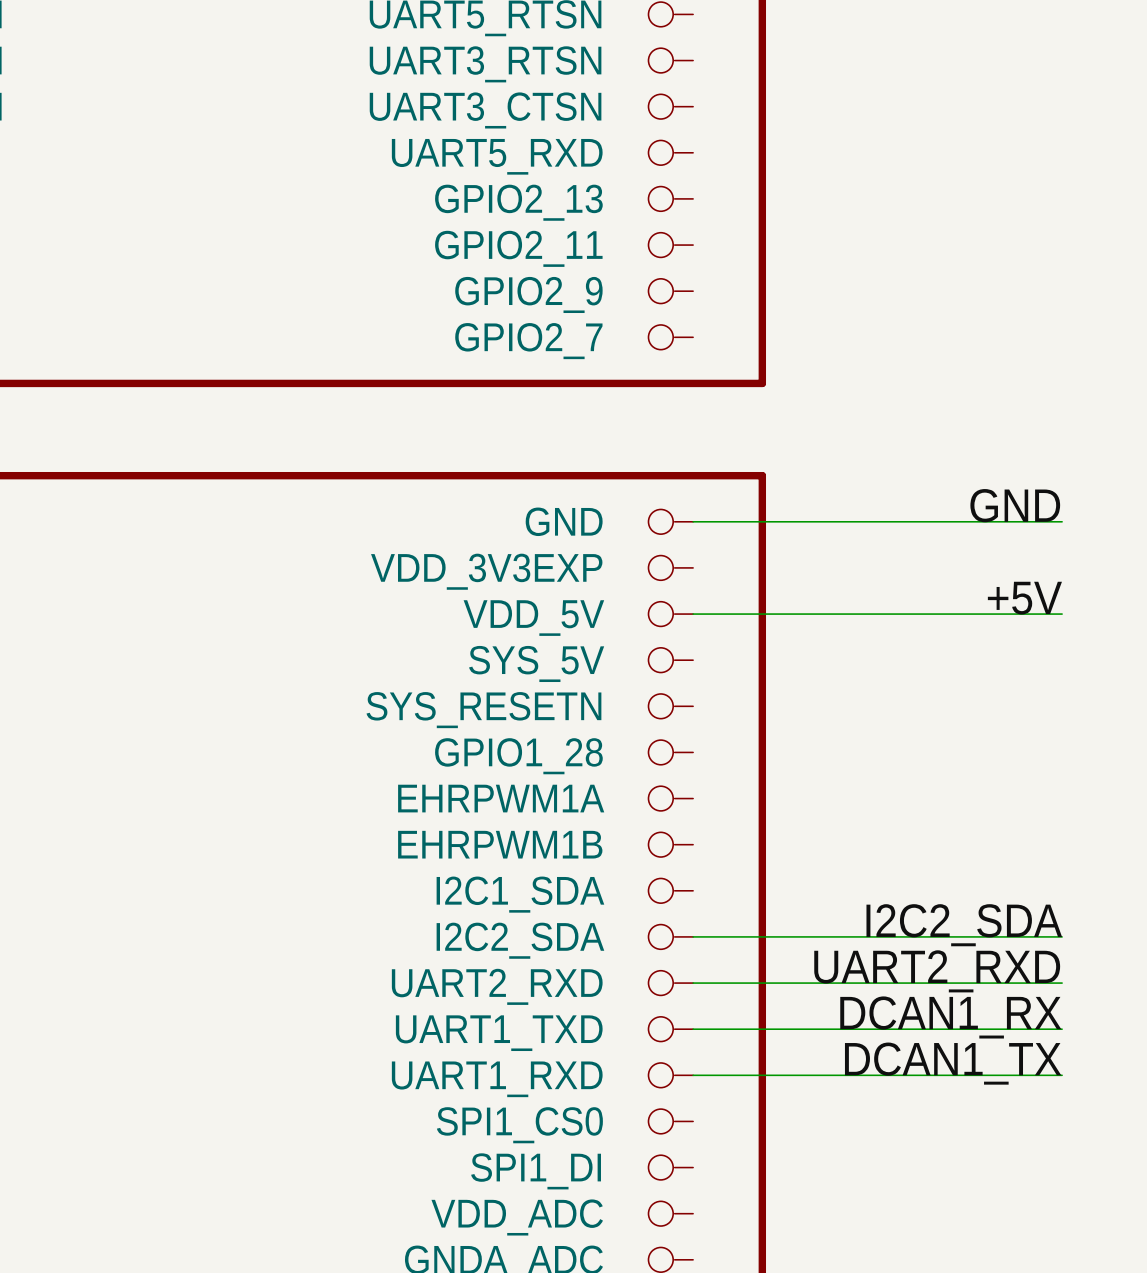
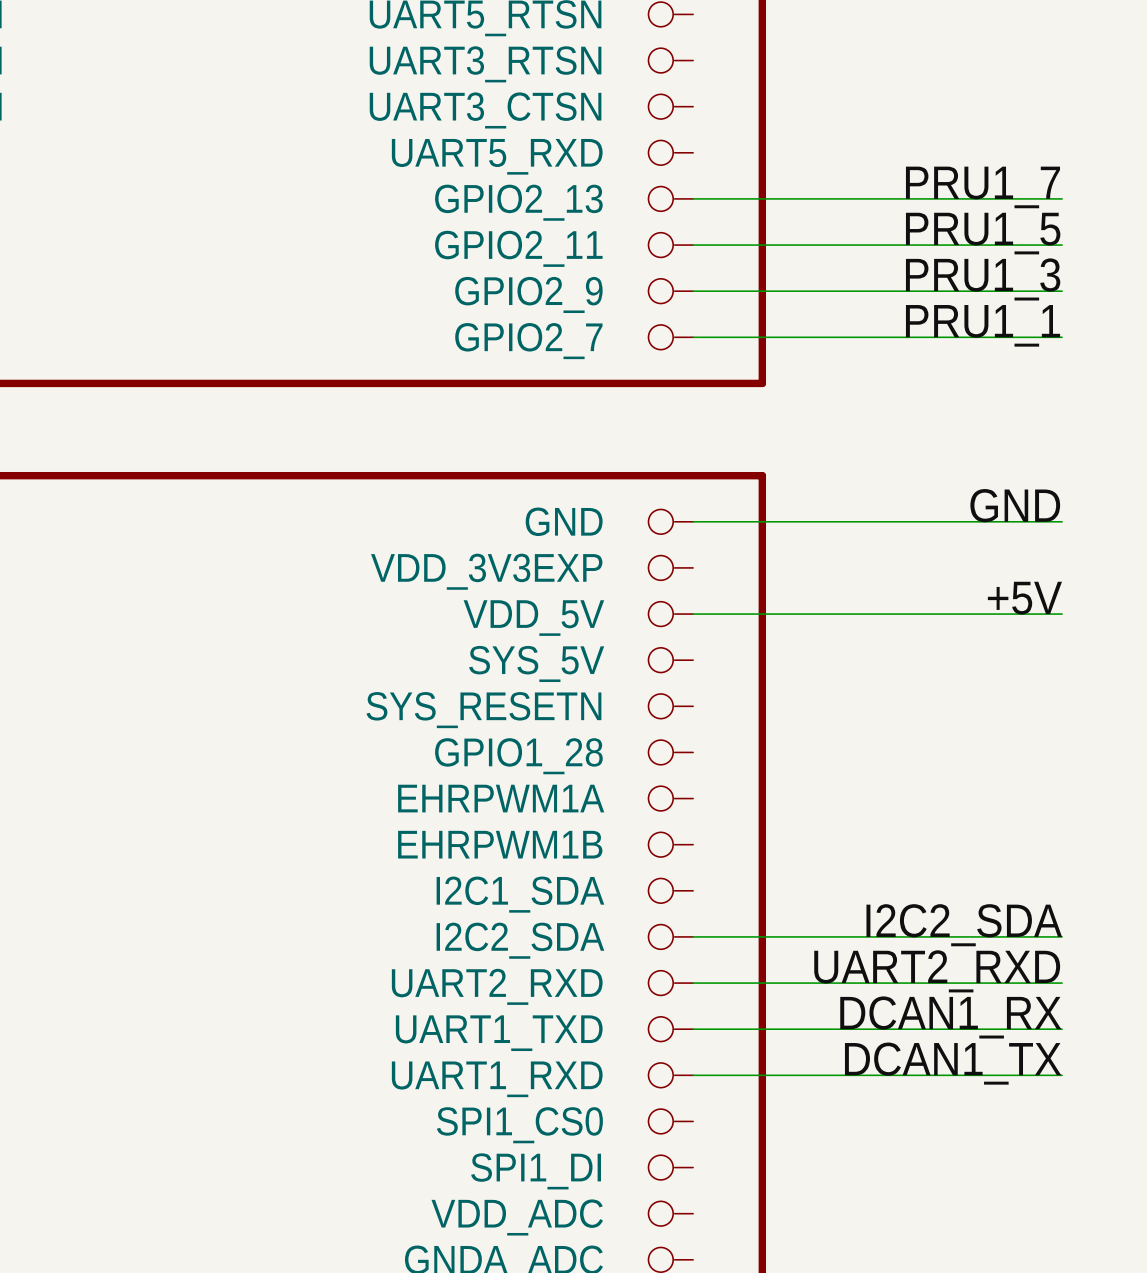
label: none -> PRU1_7 (982, 187)
wire: none -> (693, 198) (1062, 198)
label: none -> PRU1_5 (983, 233)
wire: none -> (693, 245) (1062, 245)
label: none -> PRU1_3 (983, 279)
wire: none -> (693, 291) (1062, 291)
label: none -> PRU1_1 (983, 325)
wire: none -> (693, 337) (1062, 337)

